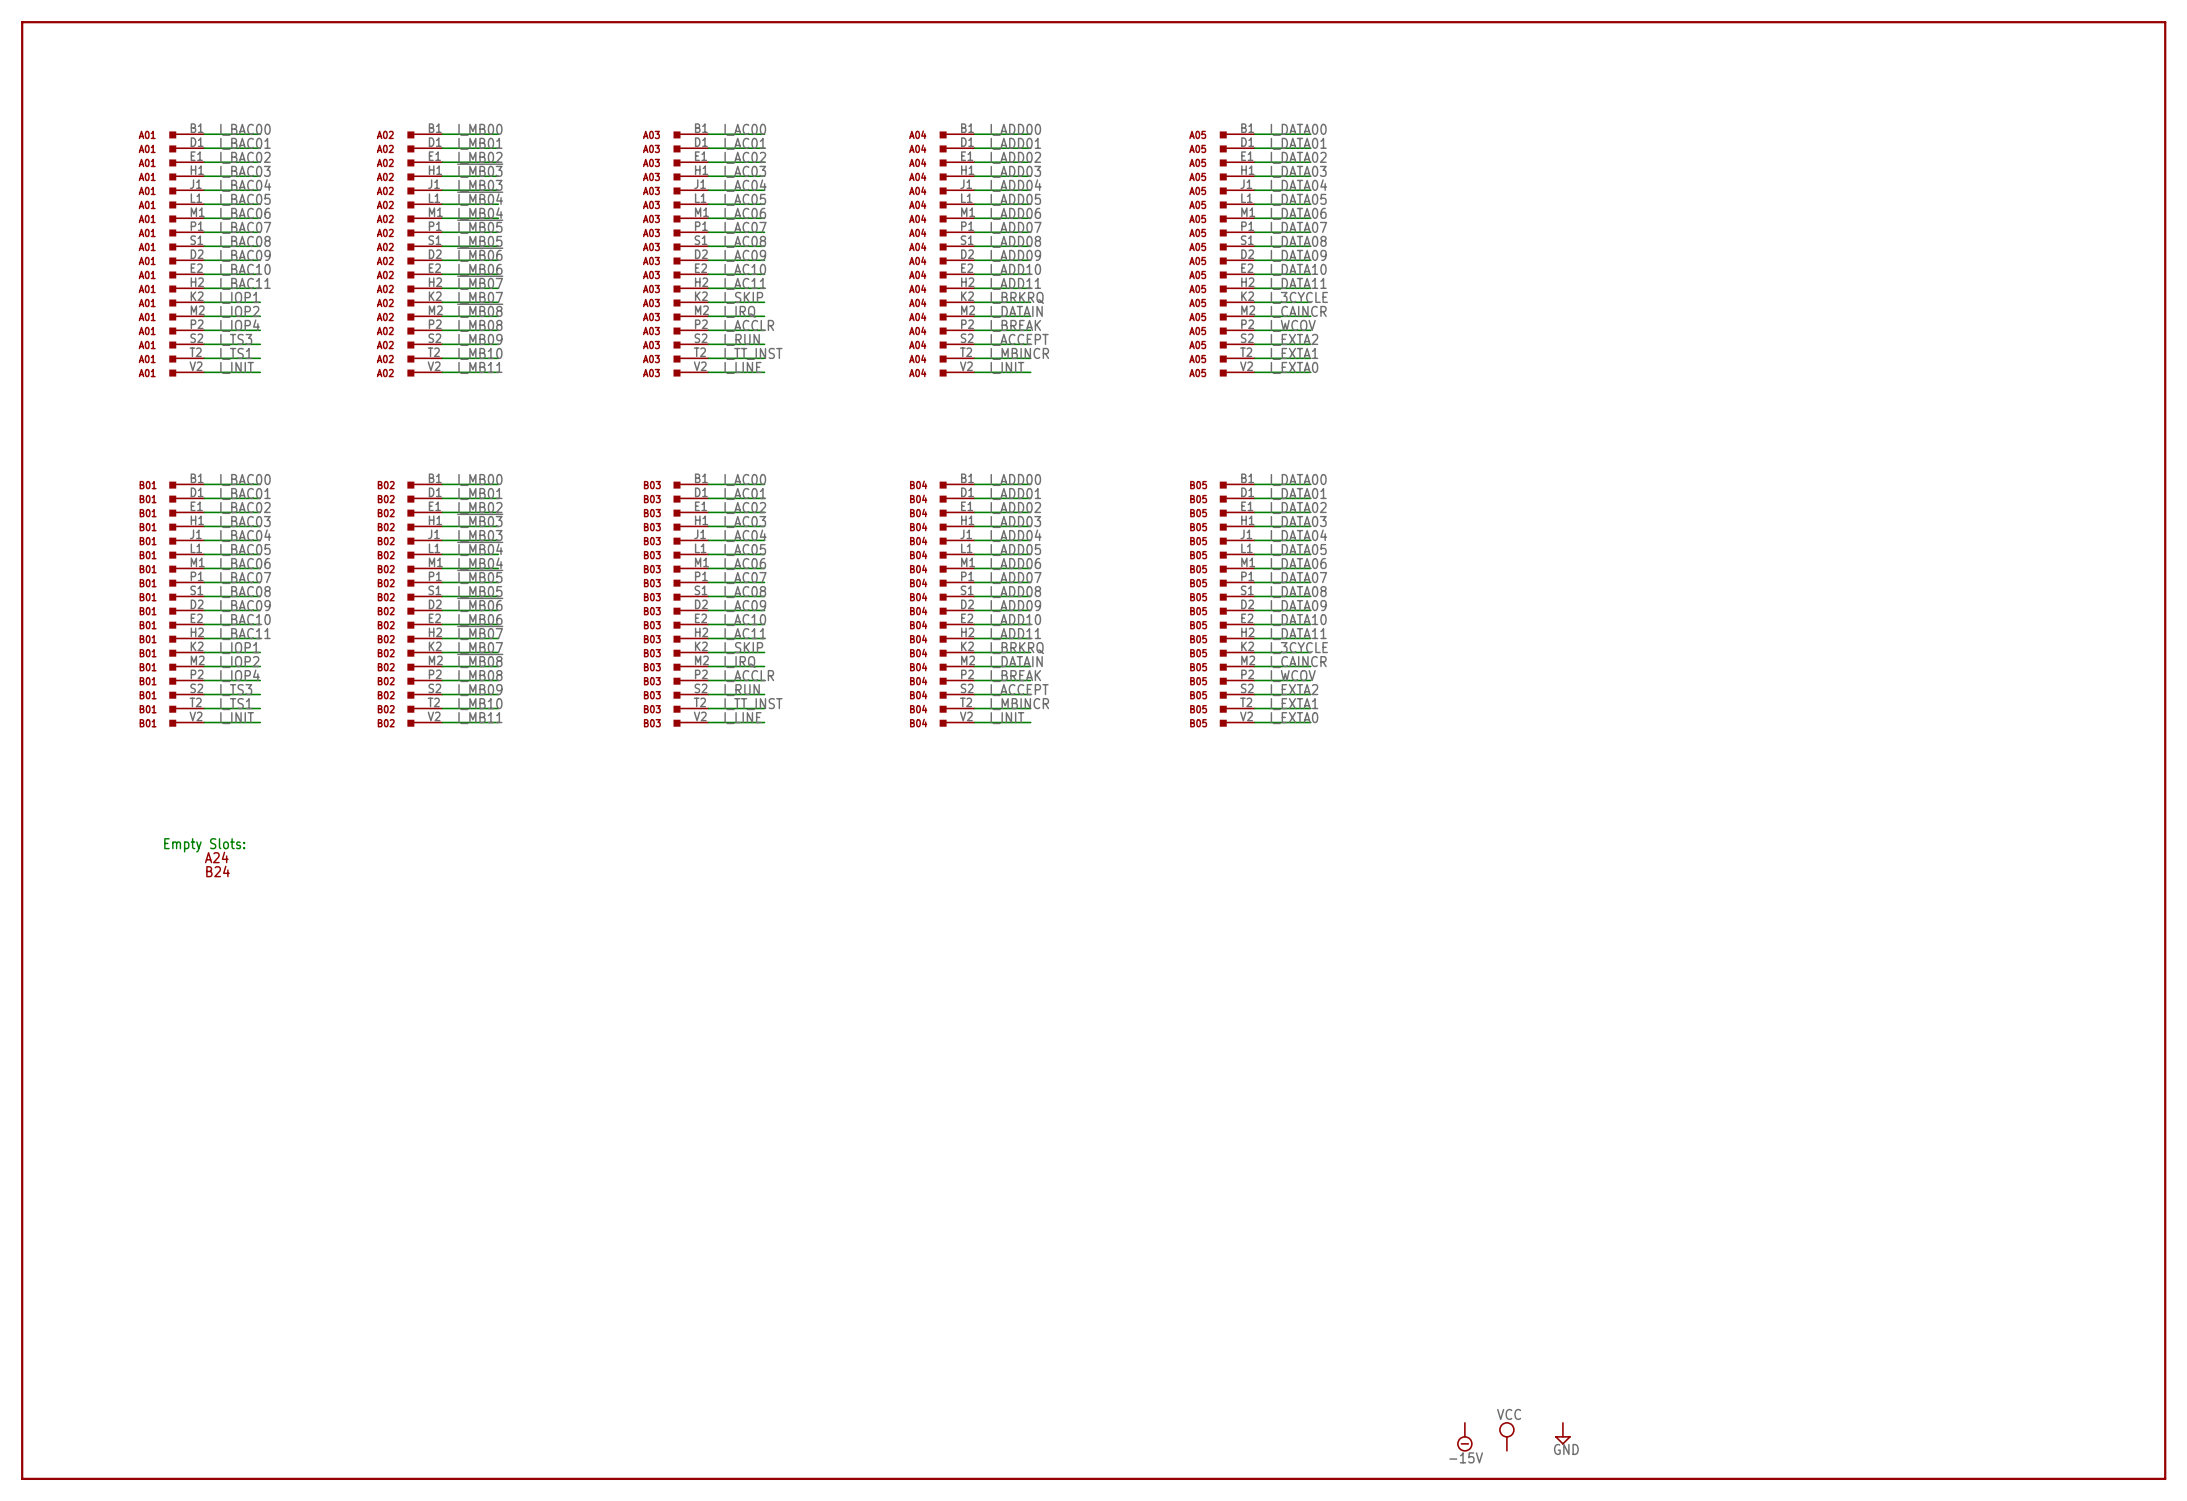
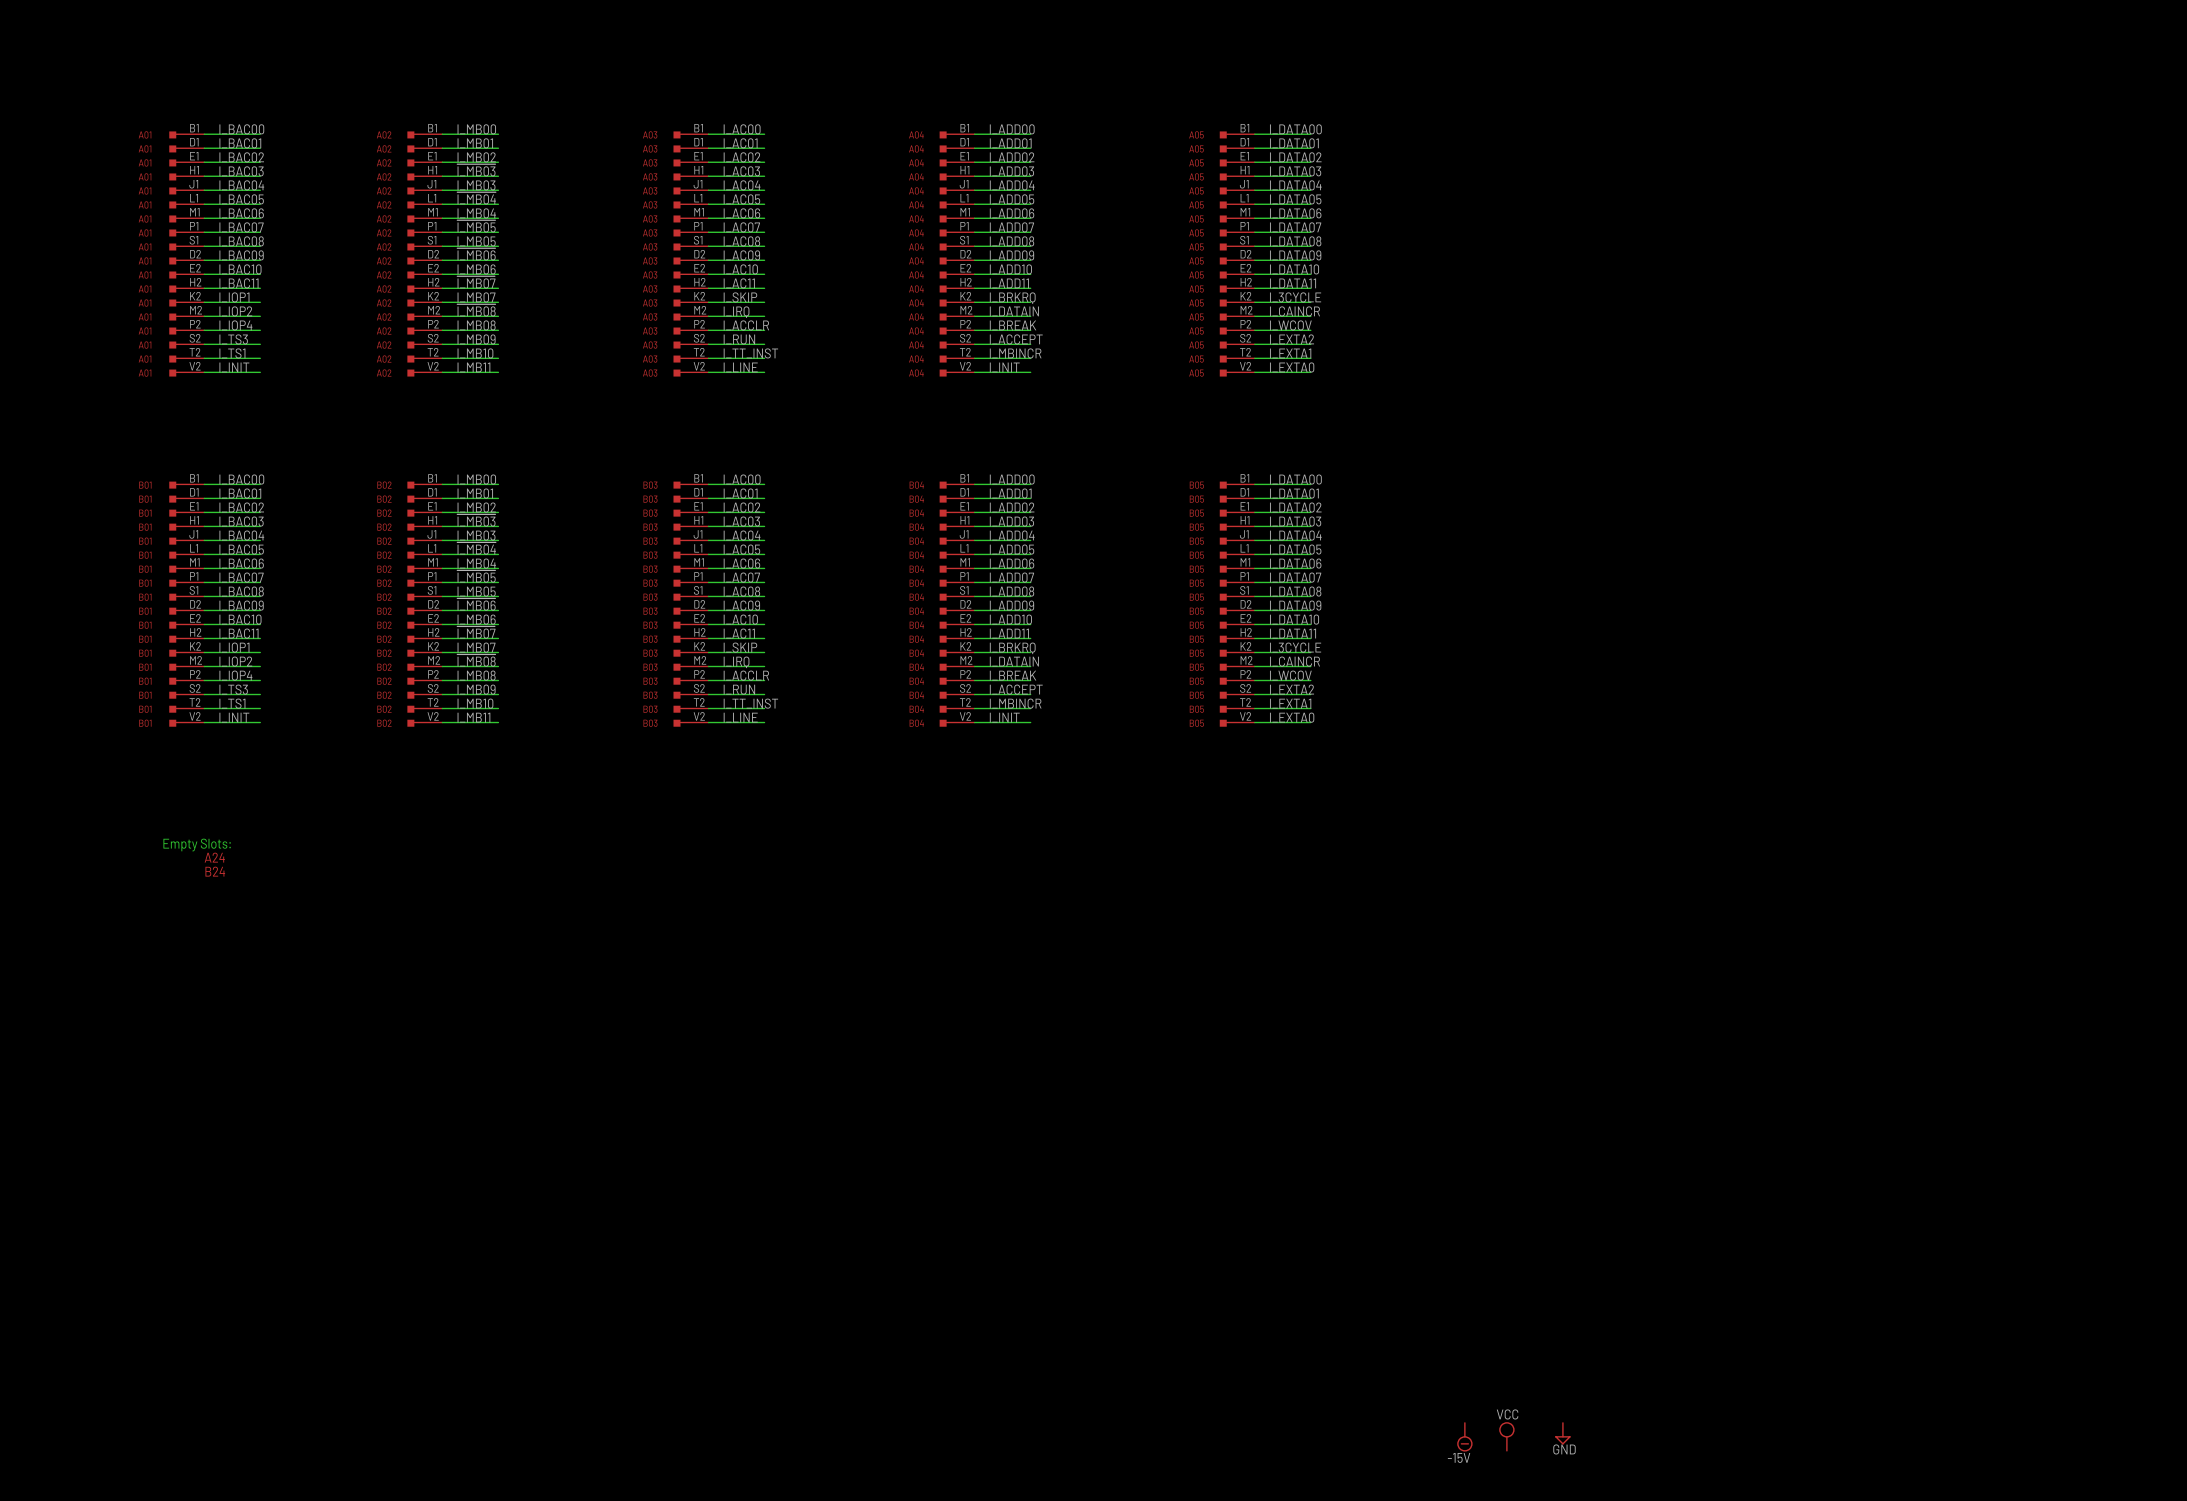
part: (1093, 750) -> none

